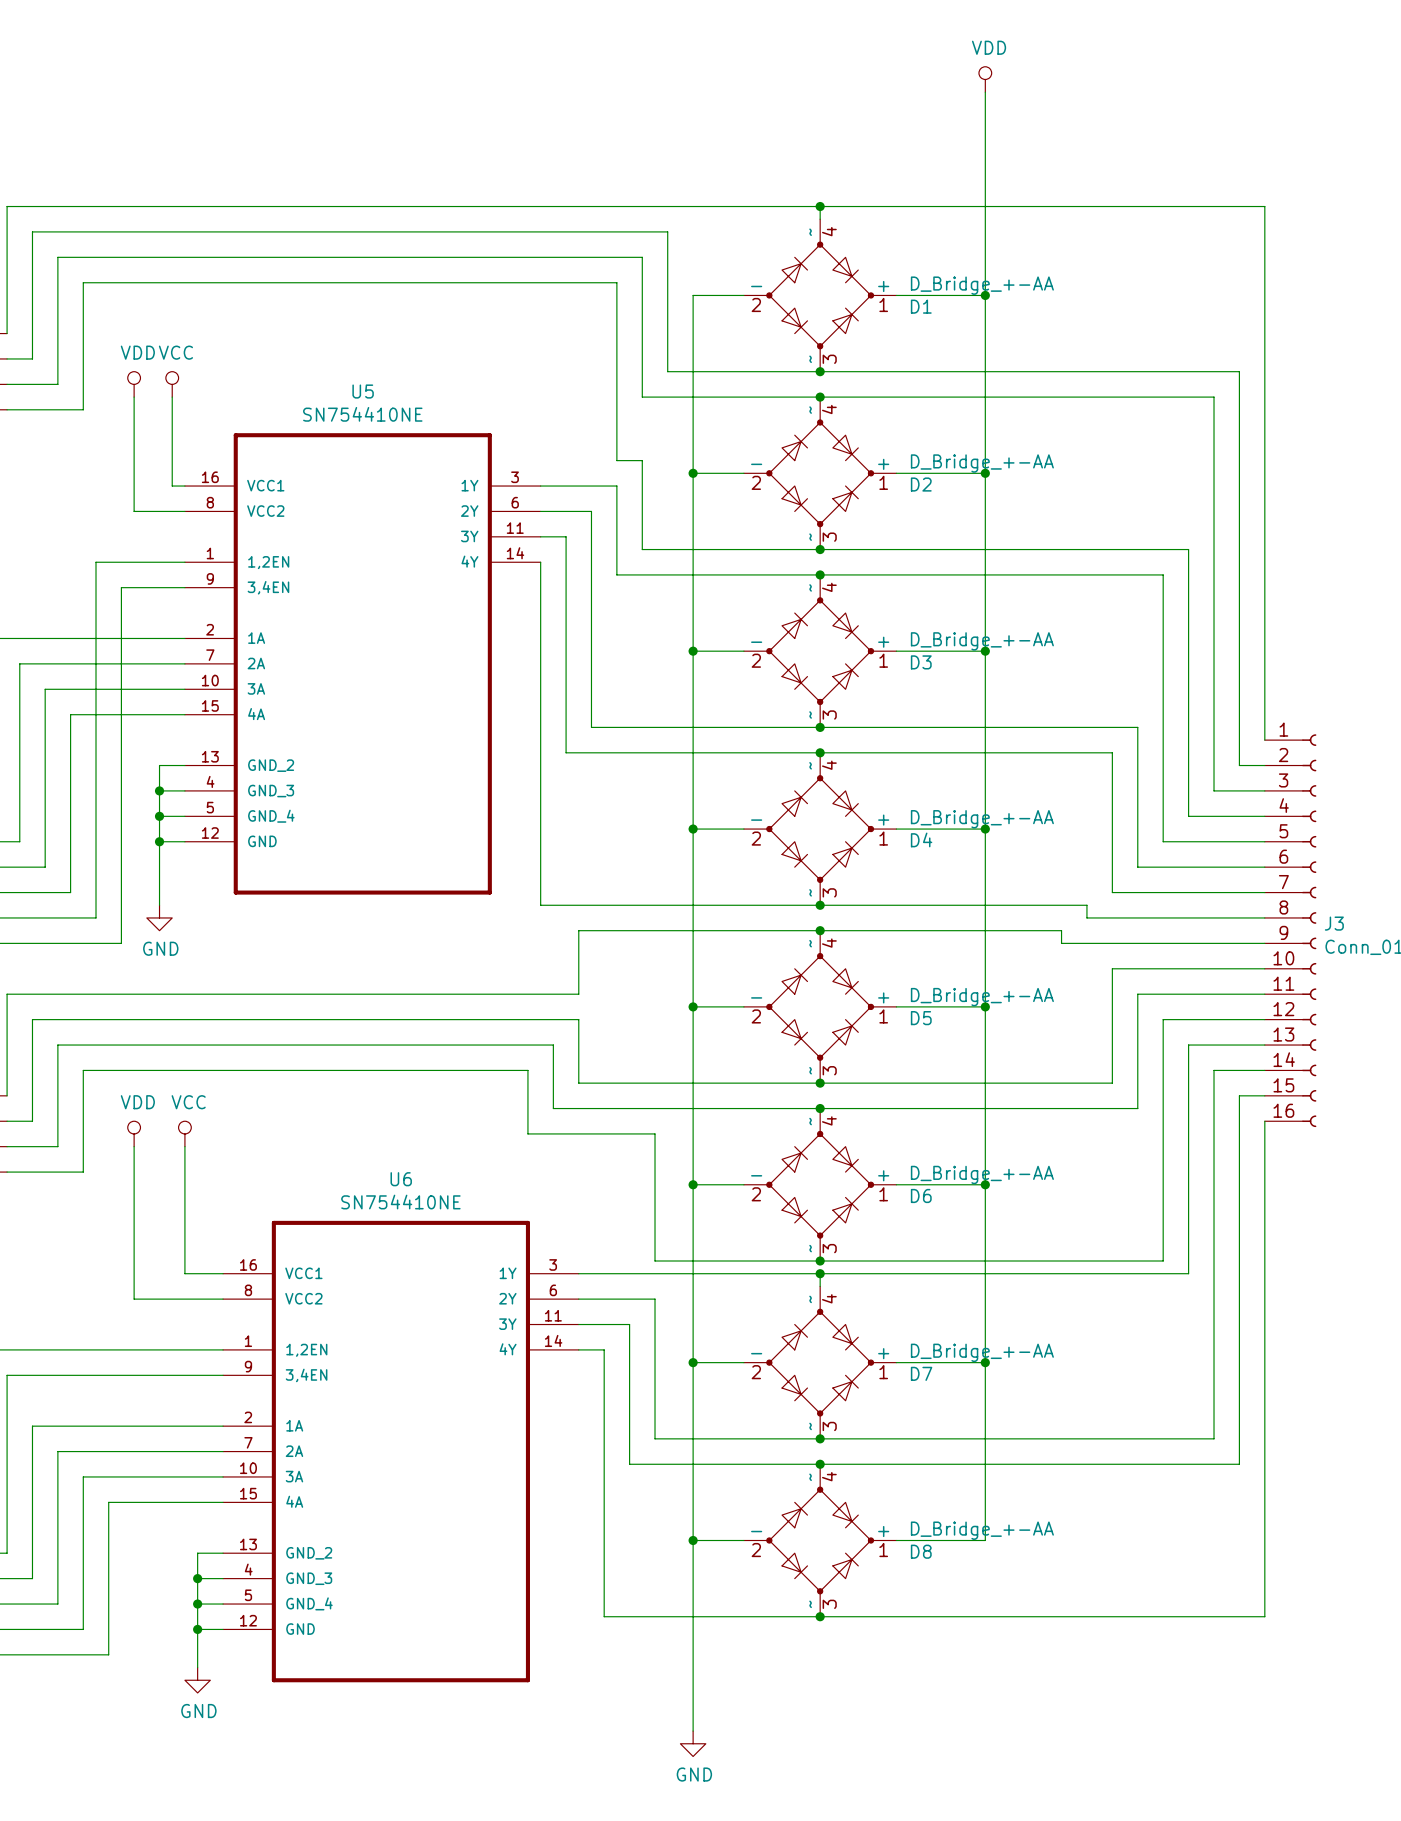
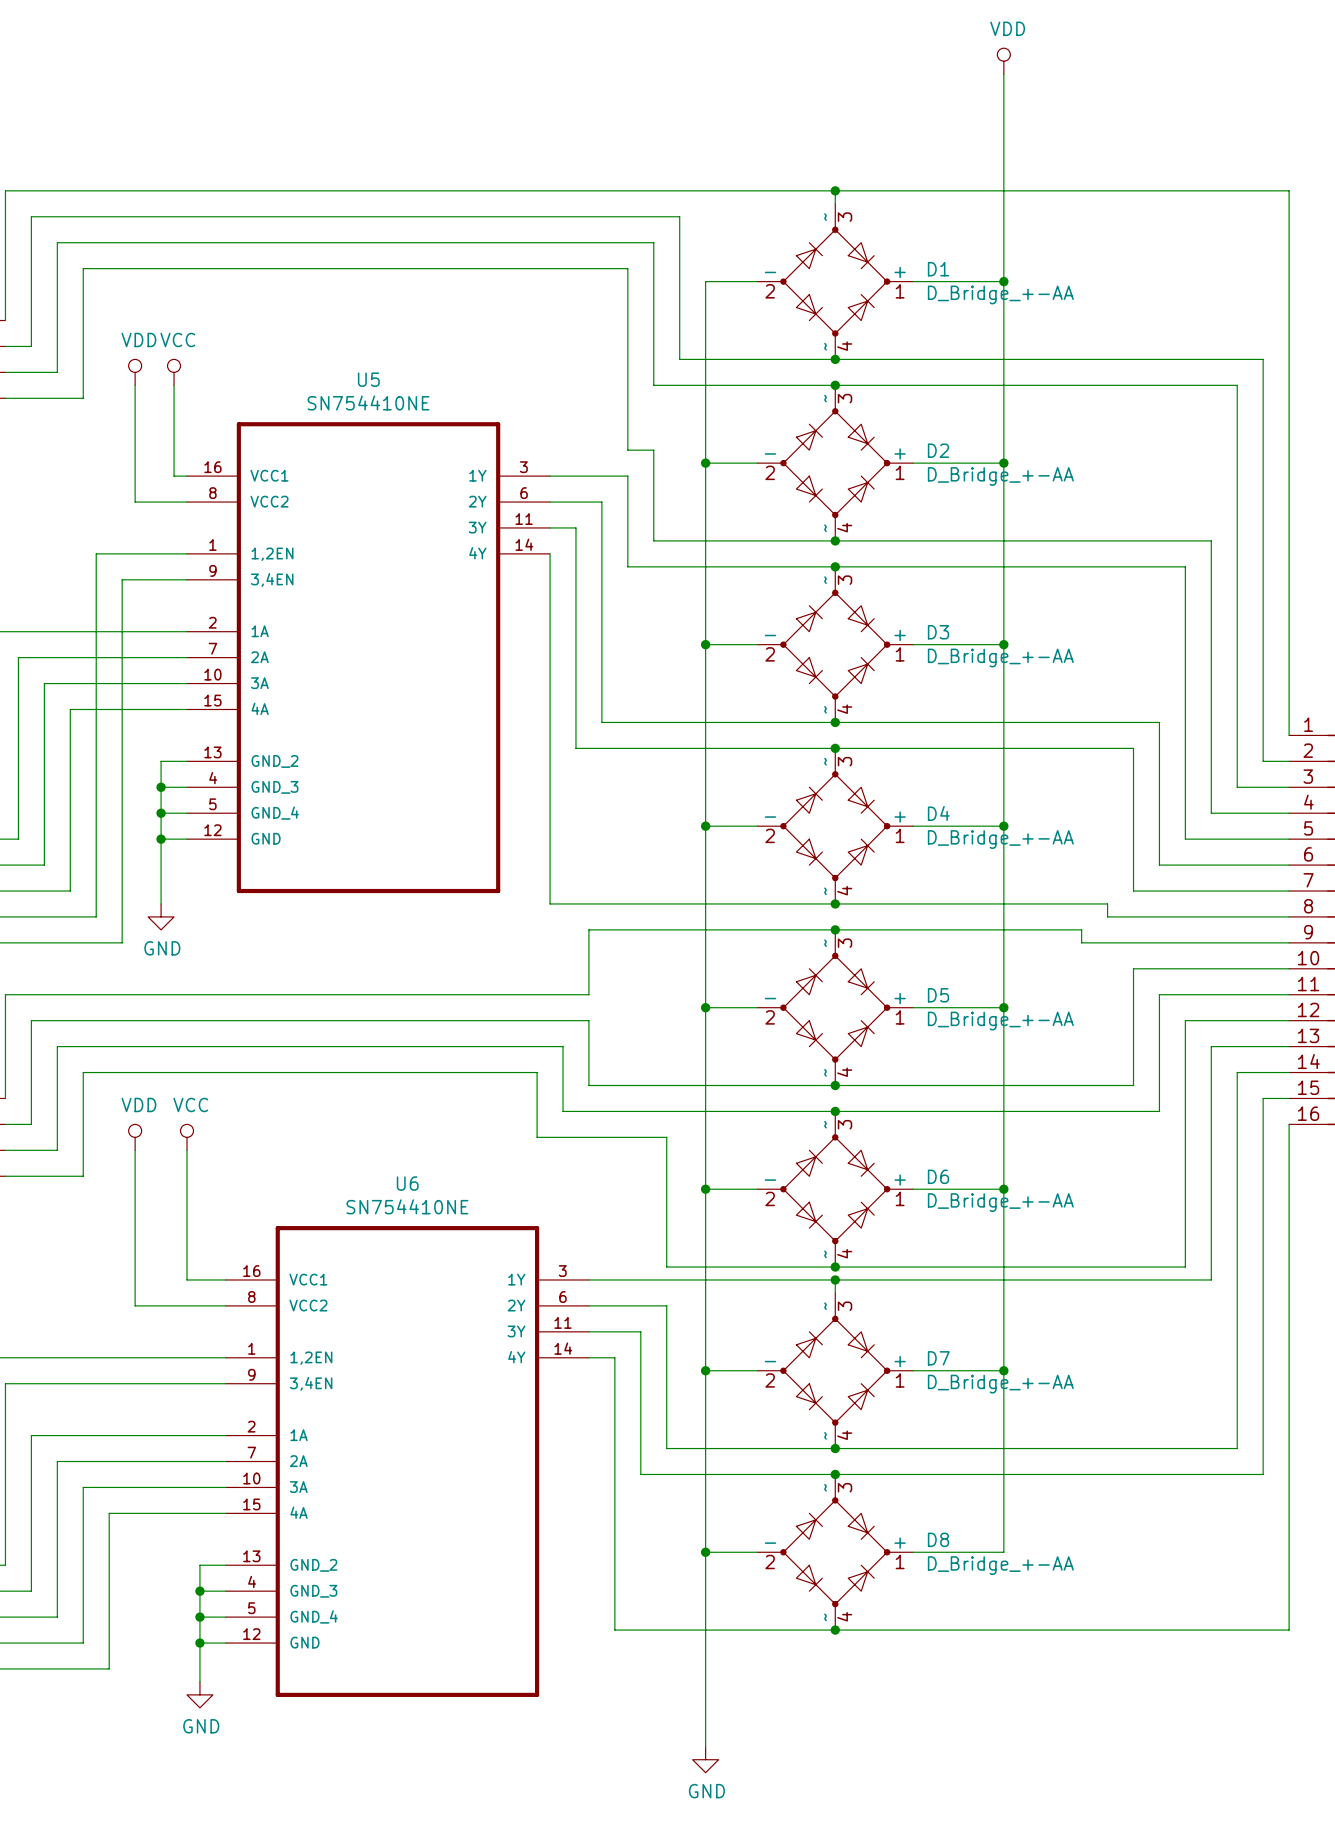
D1 flip: as is (820, 295) -> up-down (835, 281)
D2 flip: as is (820, 473) -> up-down (835, 463)
D3 flip: as is (820, 651) -> up-down (835, 644)
D4 flip: as is (820, 829) -> up-down (835, 826)
D5 flip: as is (820, 1006) -> up-down (835, 1007)
D6 flip: as is (820, 1184) -> up-down (835, 1189)
D7 flip: as is (820, 1362) -> up-down (835, 1370)
D8 flip: as is (820, 1540) -> up-down (835, 1552)

